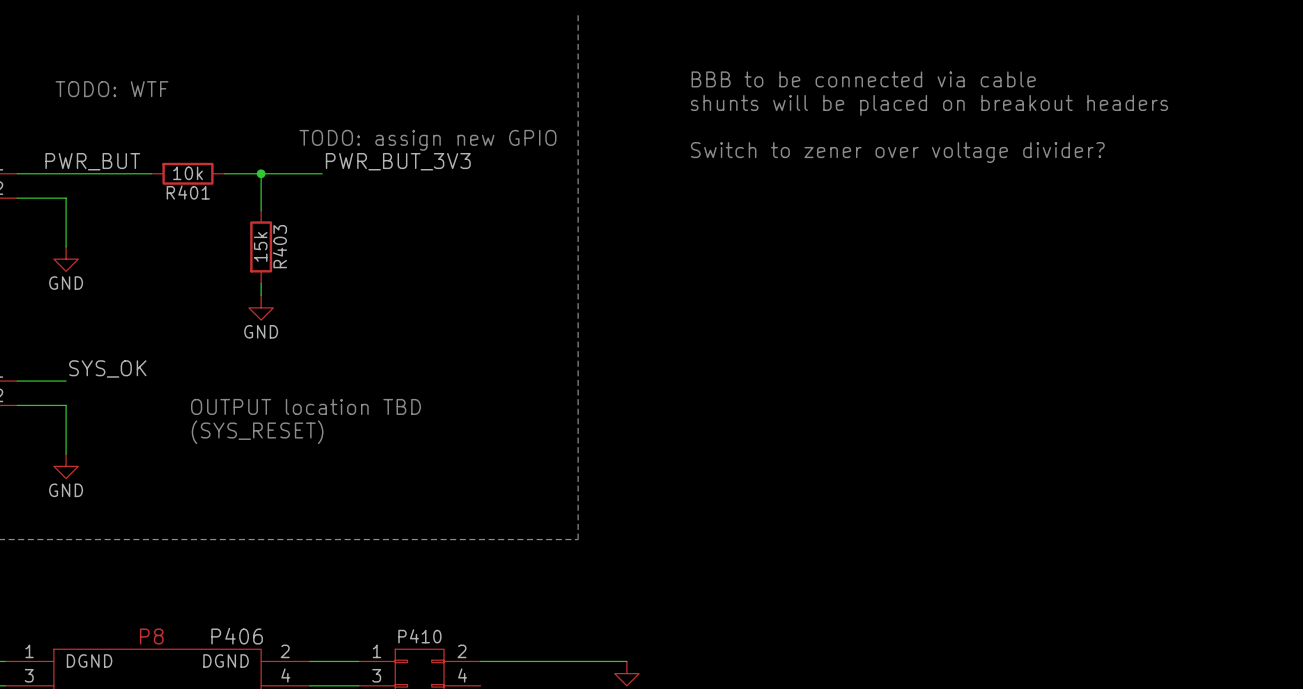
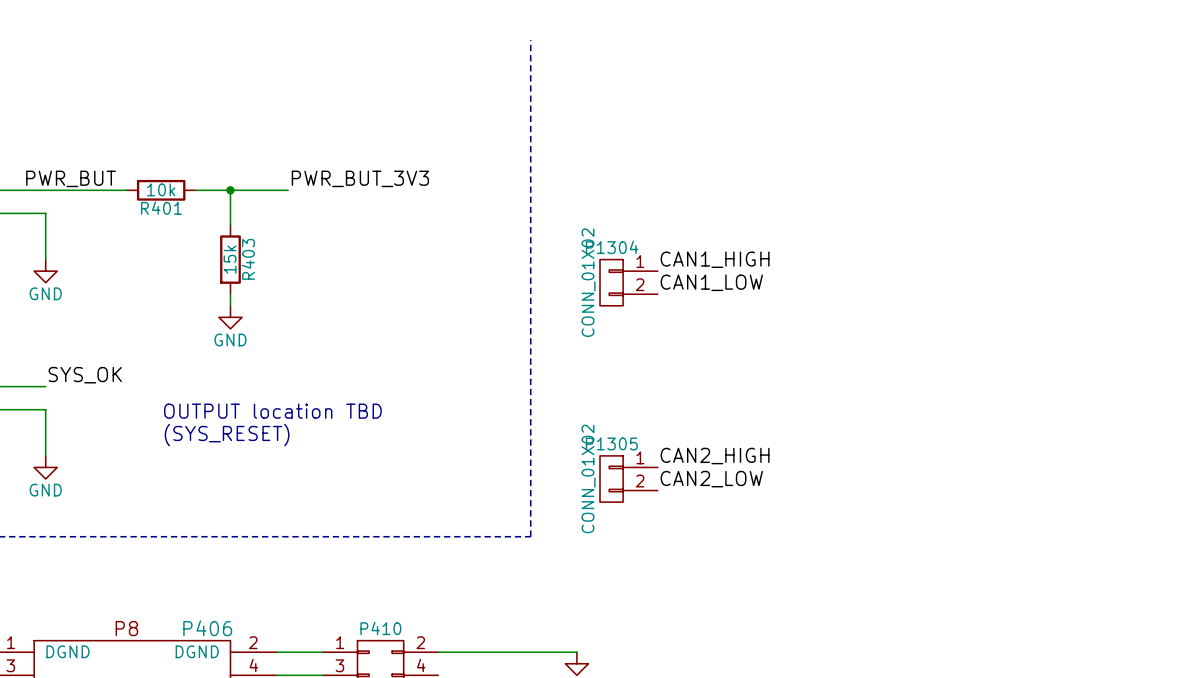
text: BBB to be connected via cable (863, 79) -> none
text: TODO: WTF (111, 89) -> none
text: shunts will be placed on breakout headers (929, 105) -> none
text: TODO: assign new GPIO (427, 140) -> none
text: Switch to zener over voltage divider? (897, 152) -> none
label: none -> CAN1_HIGH (715, 259)
P1304: none -> CONN_01X02 (628, 282)
label: none -> CAN1_LOW (711, 282)
label: none -> CAN2_HIGH (715, 456)
P1305: none -> CONN_01X02 (628, 479)
label: none -> CAN2_LOW (711, 479)

